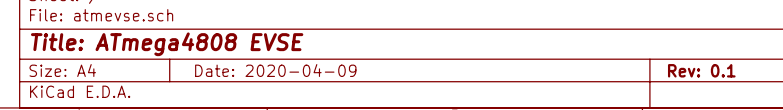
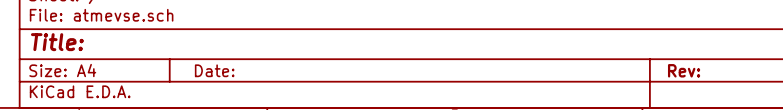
title block: Title: ATmega4808 EVSE (167, 44) -> Title: (57, 42)
title block: Date: 2020-04-09 (275, 70) -> Date: (214, 70)
title block: Rev: 0.1 (701, 70) -> Rev: (684, 70)

